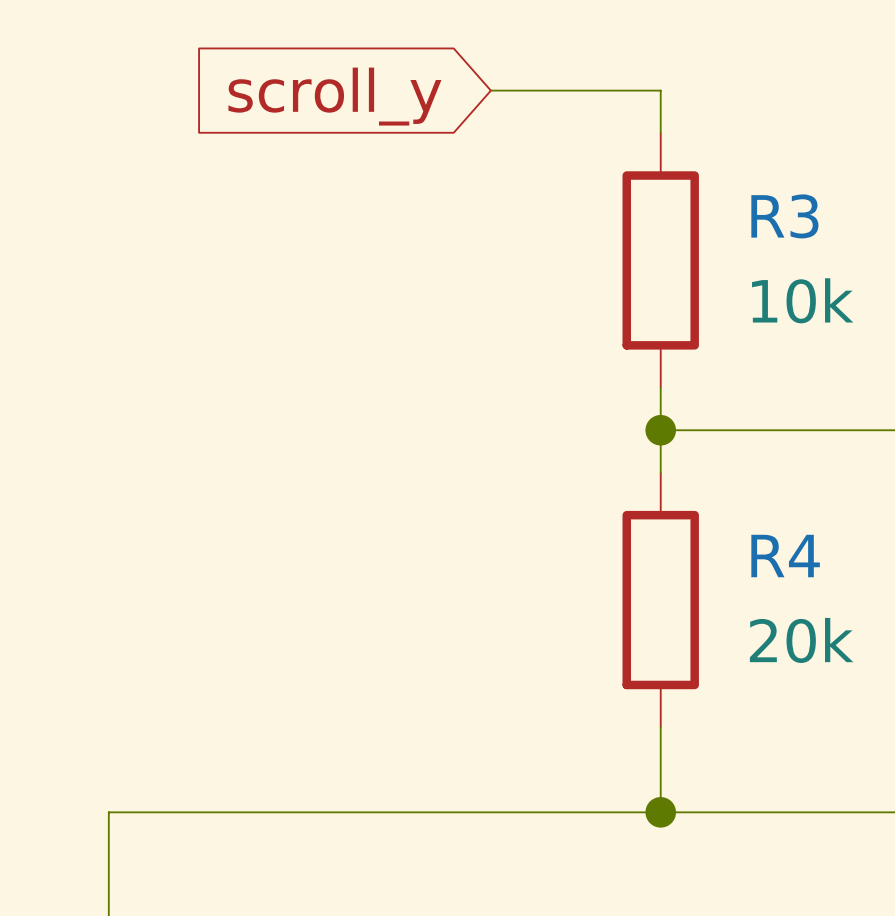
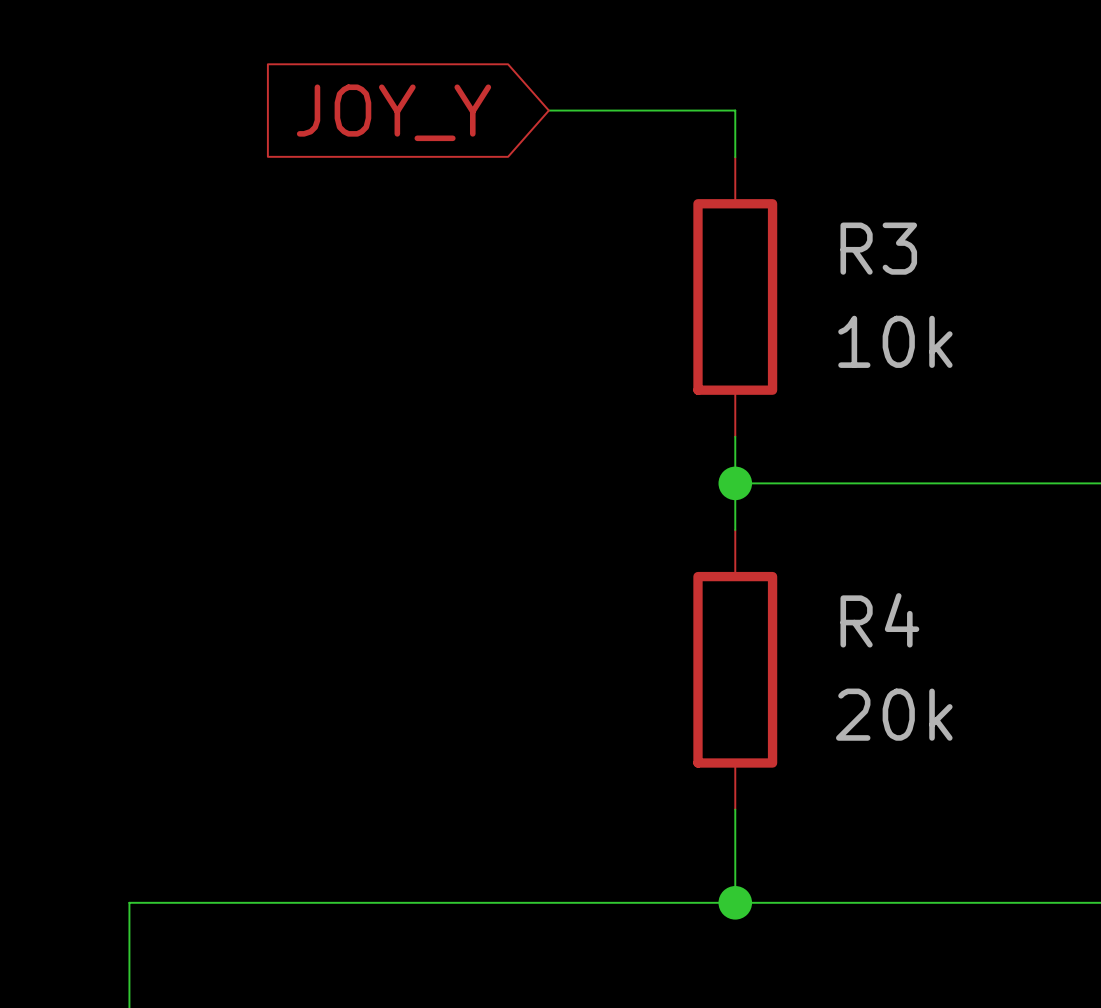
global label: scroll_y (334, 96) -> JOY_Y (394, 112)

